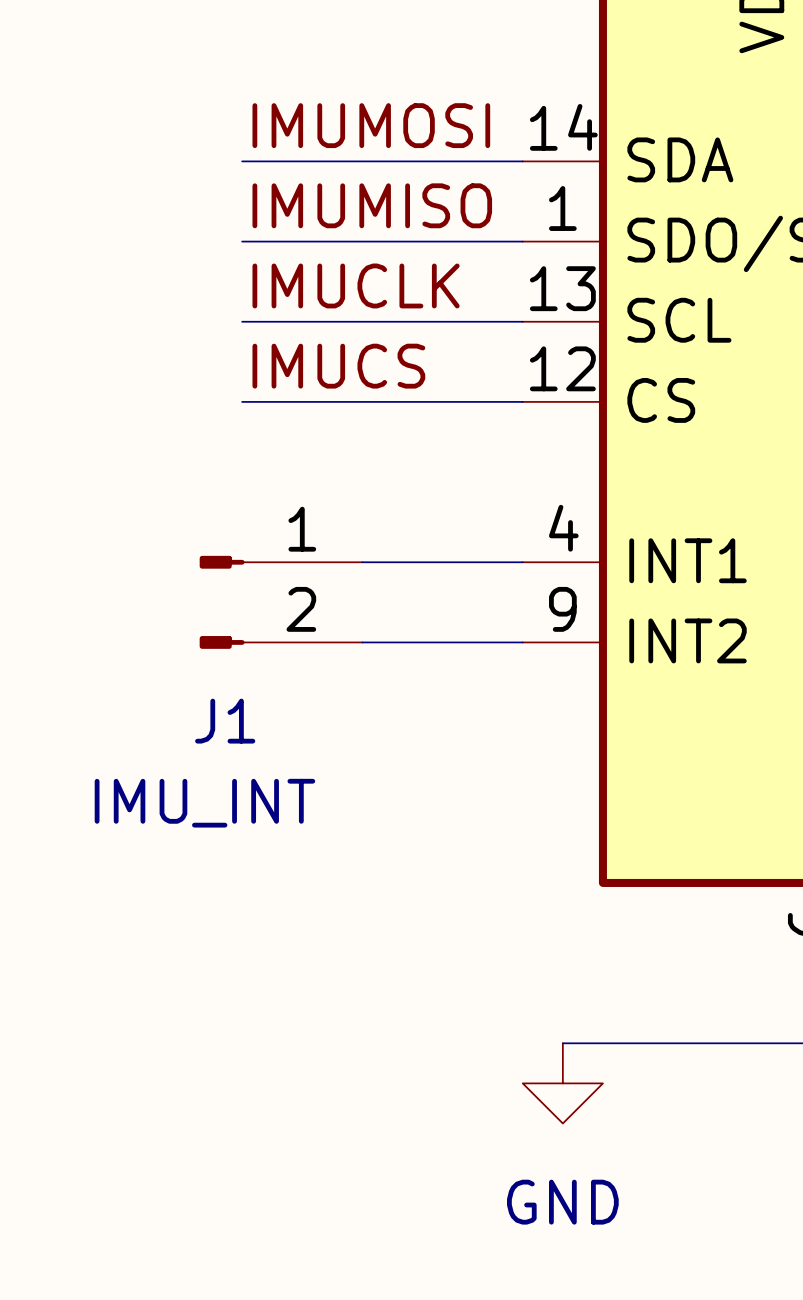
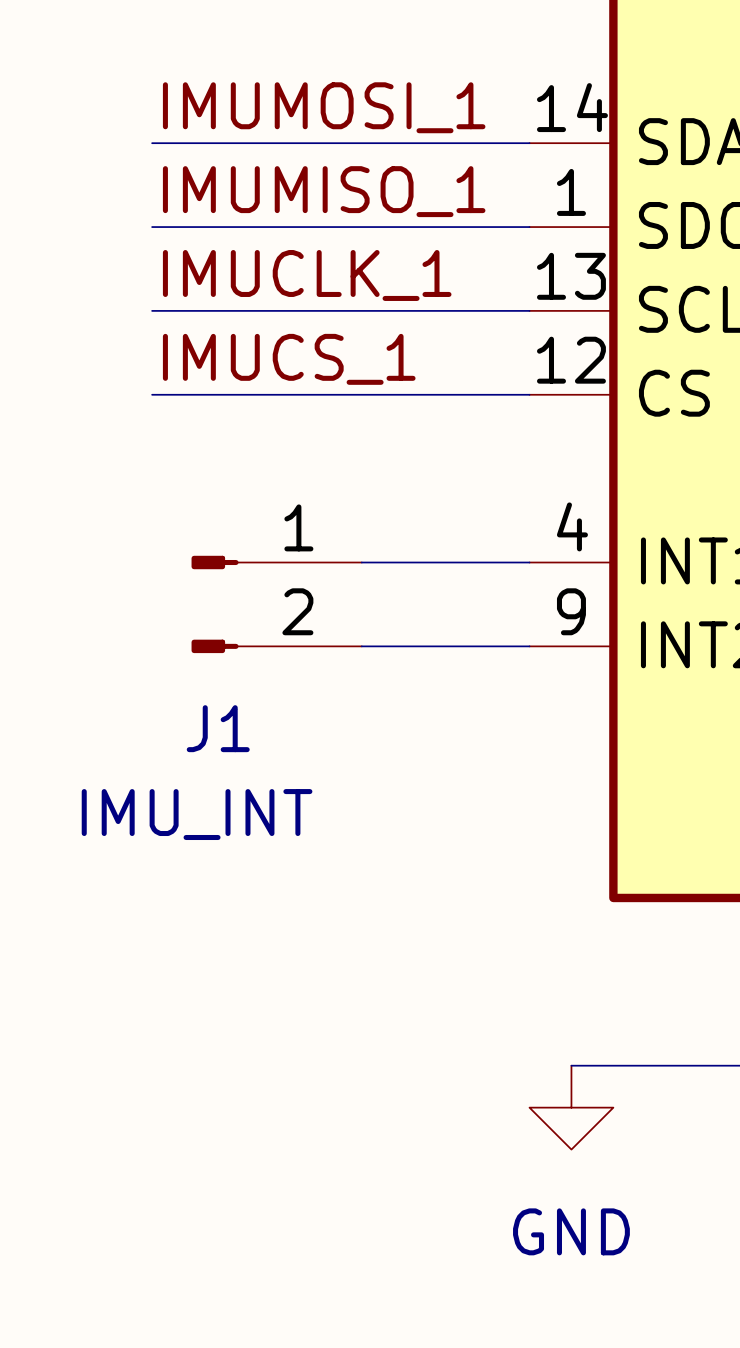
label: IMUMOSI (371, 125) -> none
label: none -> IMUMOSI_1 (324, 107)
wire: none -> (152, 143) (235, 143)
label: IMUMISO (372, 205) -> none
label: none -> IMUMISO_1 (324, 191)
wire: none -> (152, 227) (235, 227)
label: IMUCLK (356, 285) -> none
label: none -> IMUCLK_1 (307, 275)
wire: none -> (152, 310) (235, 310)
label: IMUCS (338, 366) -> none
label: none -> IMUCS_1 (289, 359)
wire: none -> (152, 394) (235, 394)

